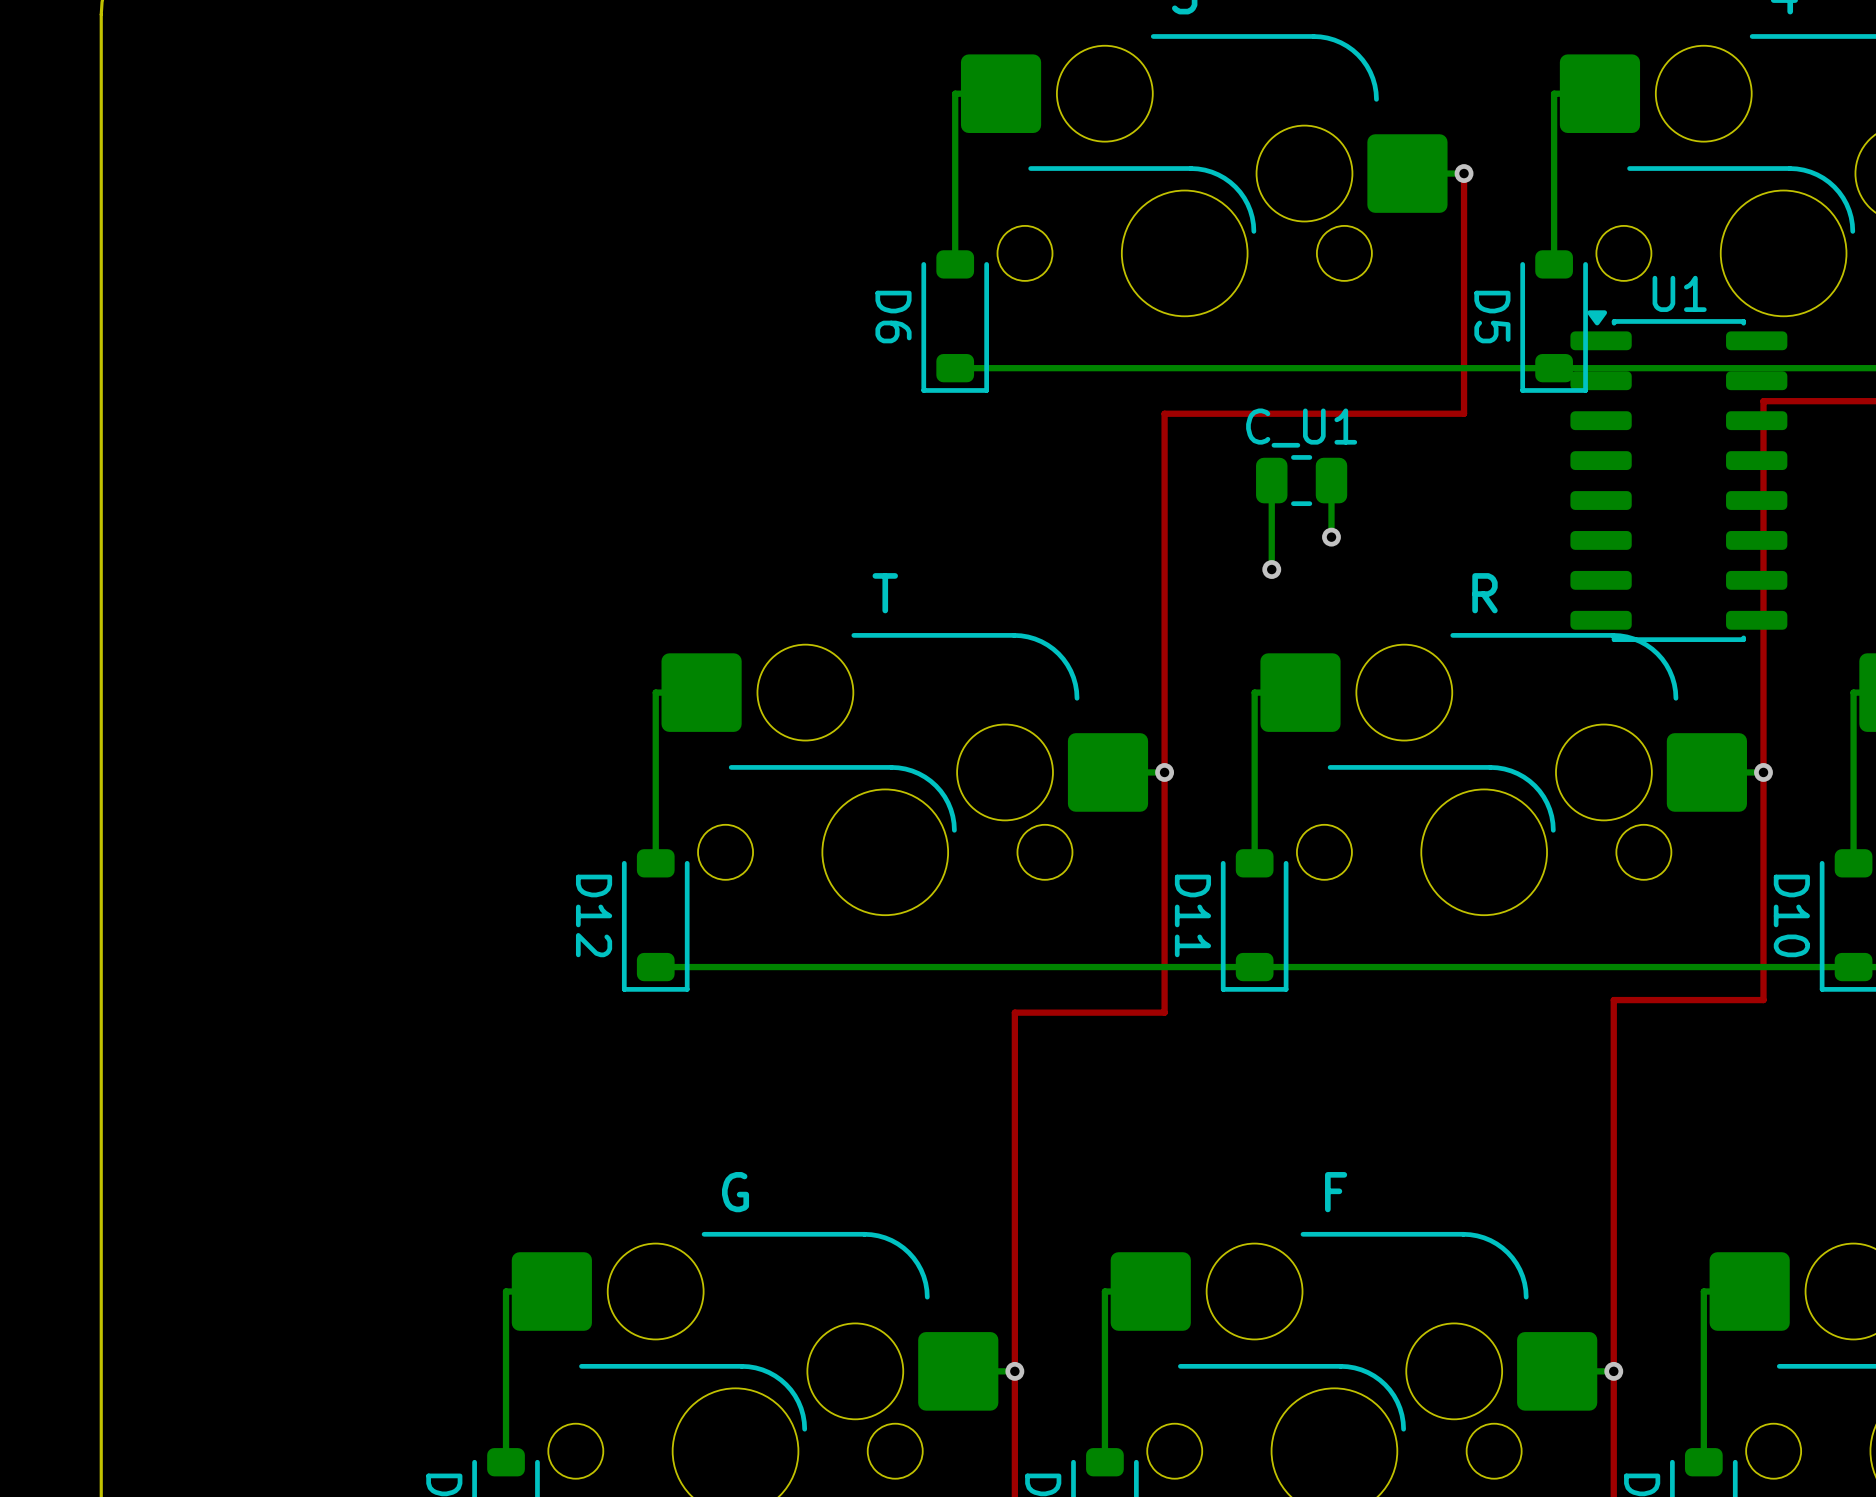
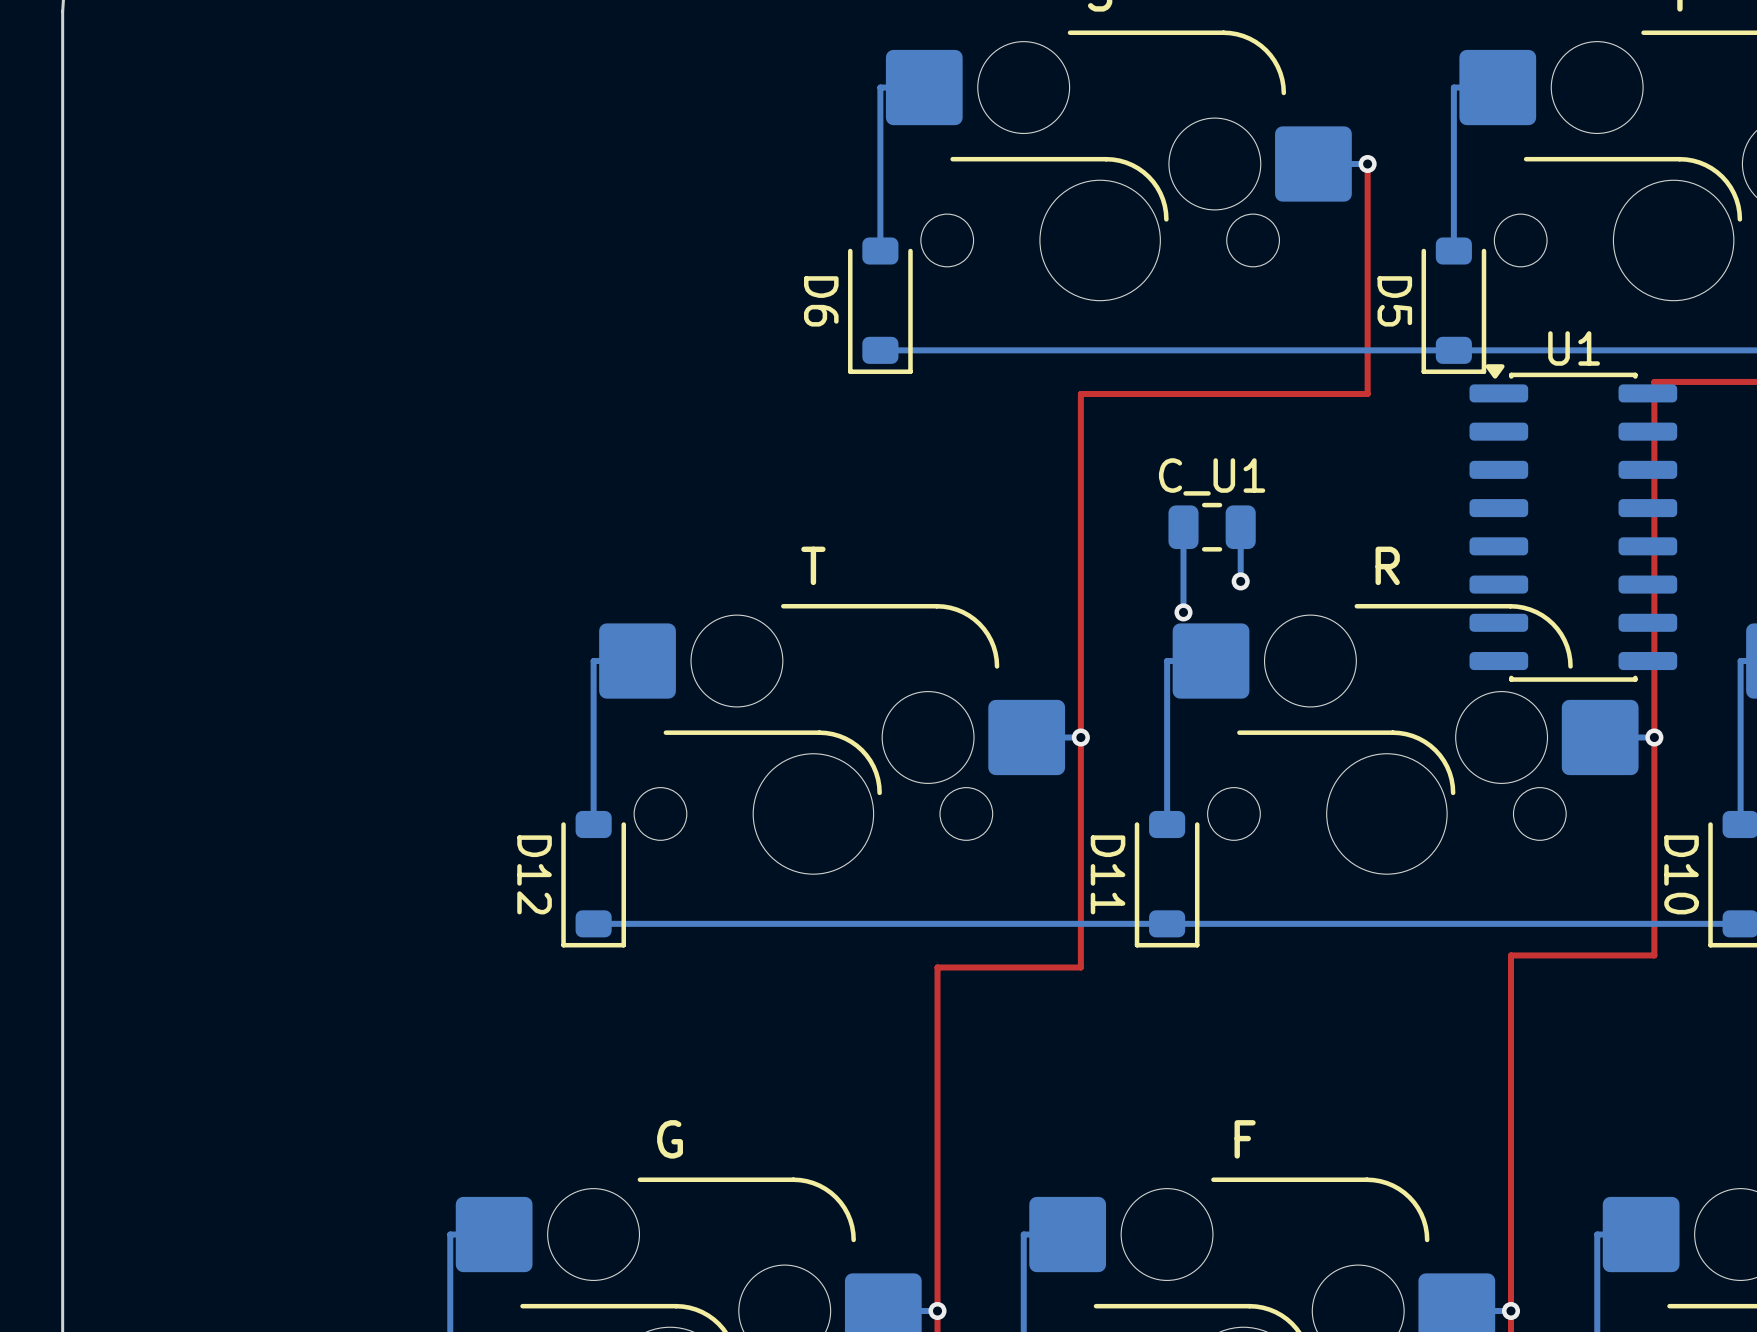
U1 position: (1678, 476) -> (1573, 523)
bottom track: (1271, 480) (1271, 552) -> (1183, 543) (1183, 612)
C_U1 position: (1301, 480) -> (1212, 527)
bottom track: (1331, 480) (1331, 537) -> (1240, 527) (1240, 581)
via: (1331, 537) -> none
via: (1271, 569) -> none
via: none -> (1240, 581)
via: none -> (1183, 612)

